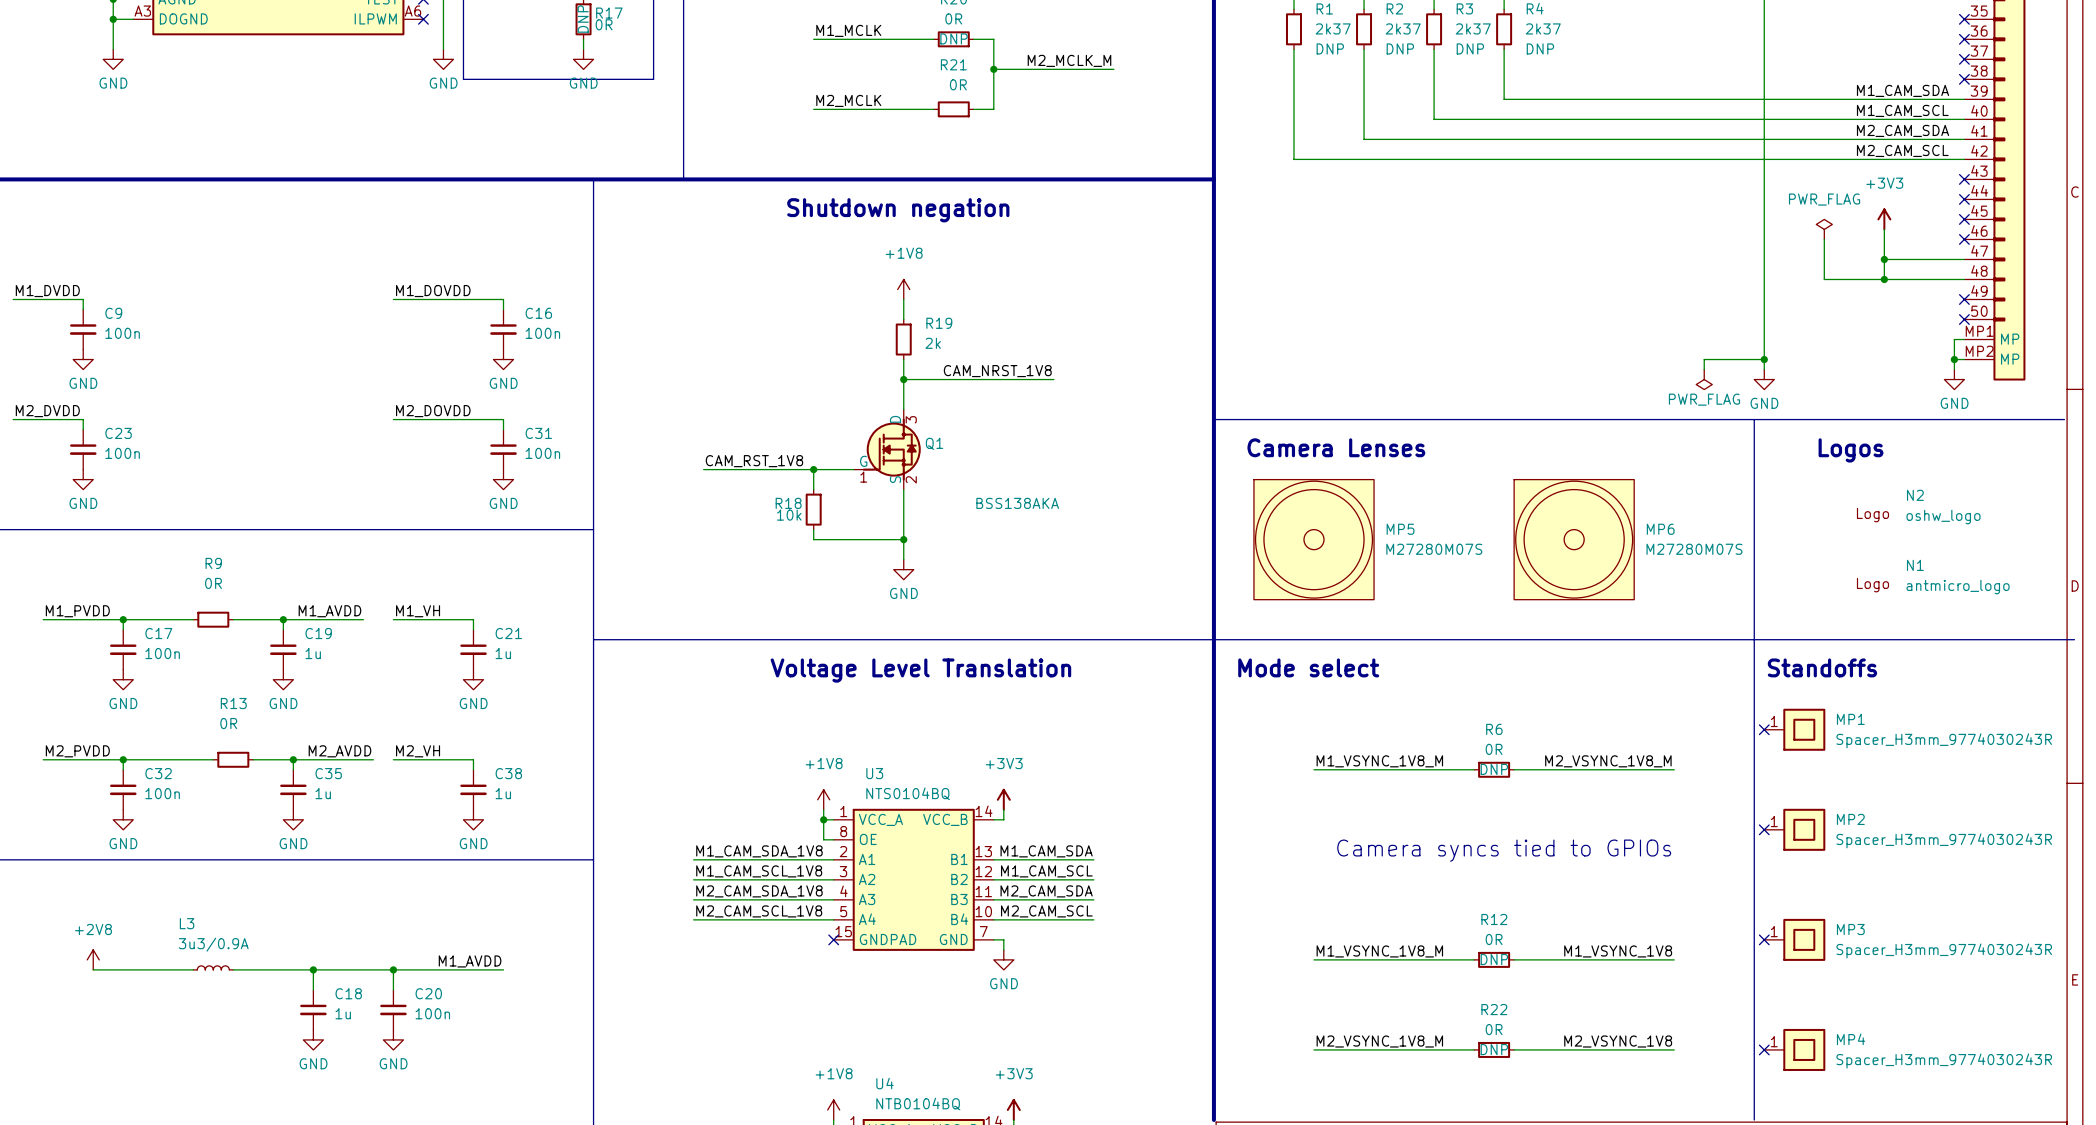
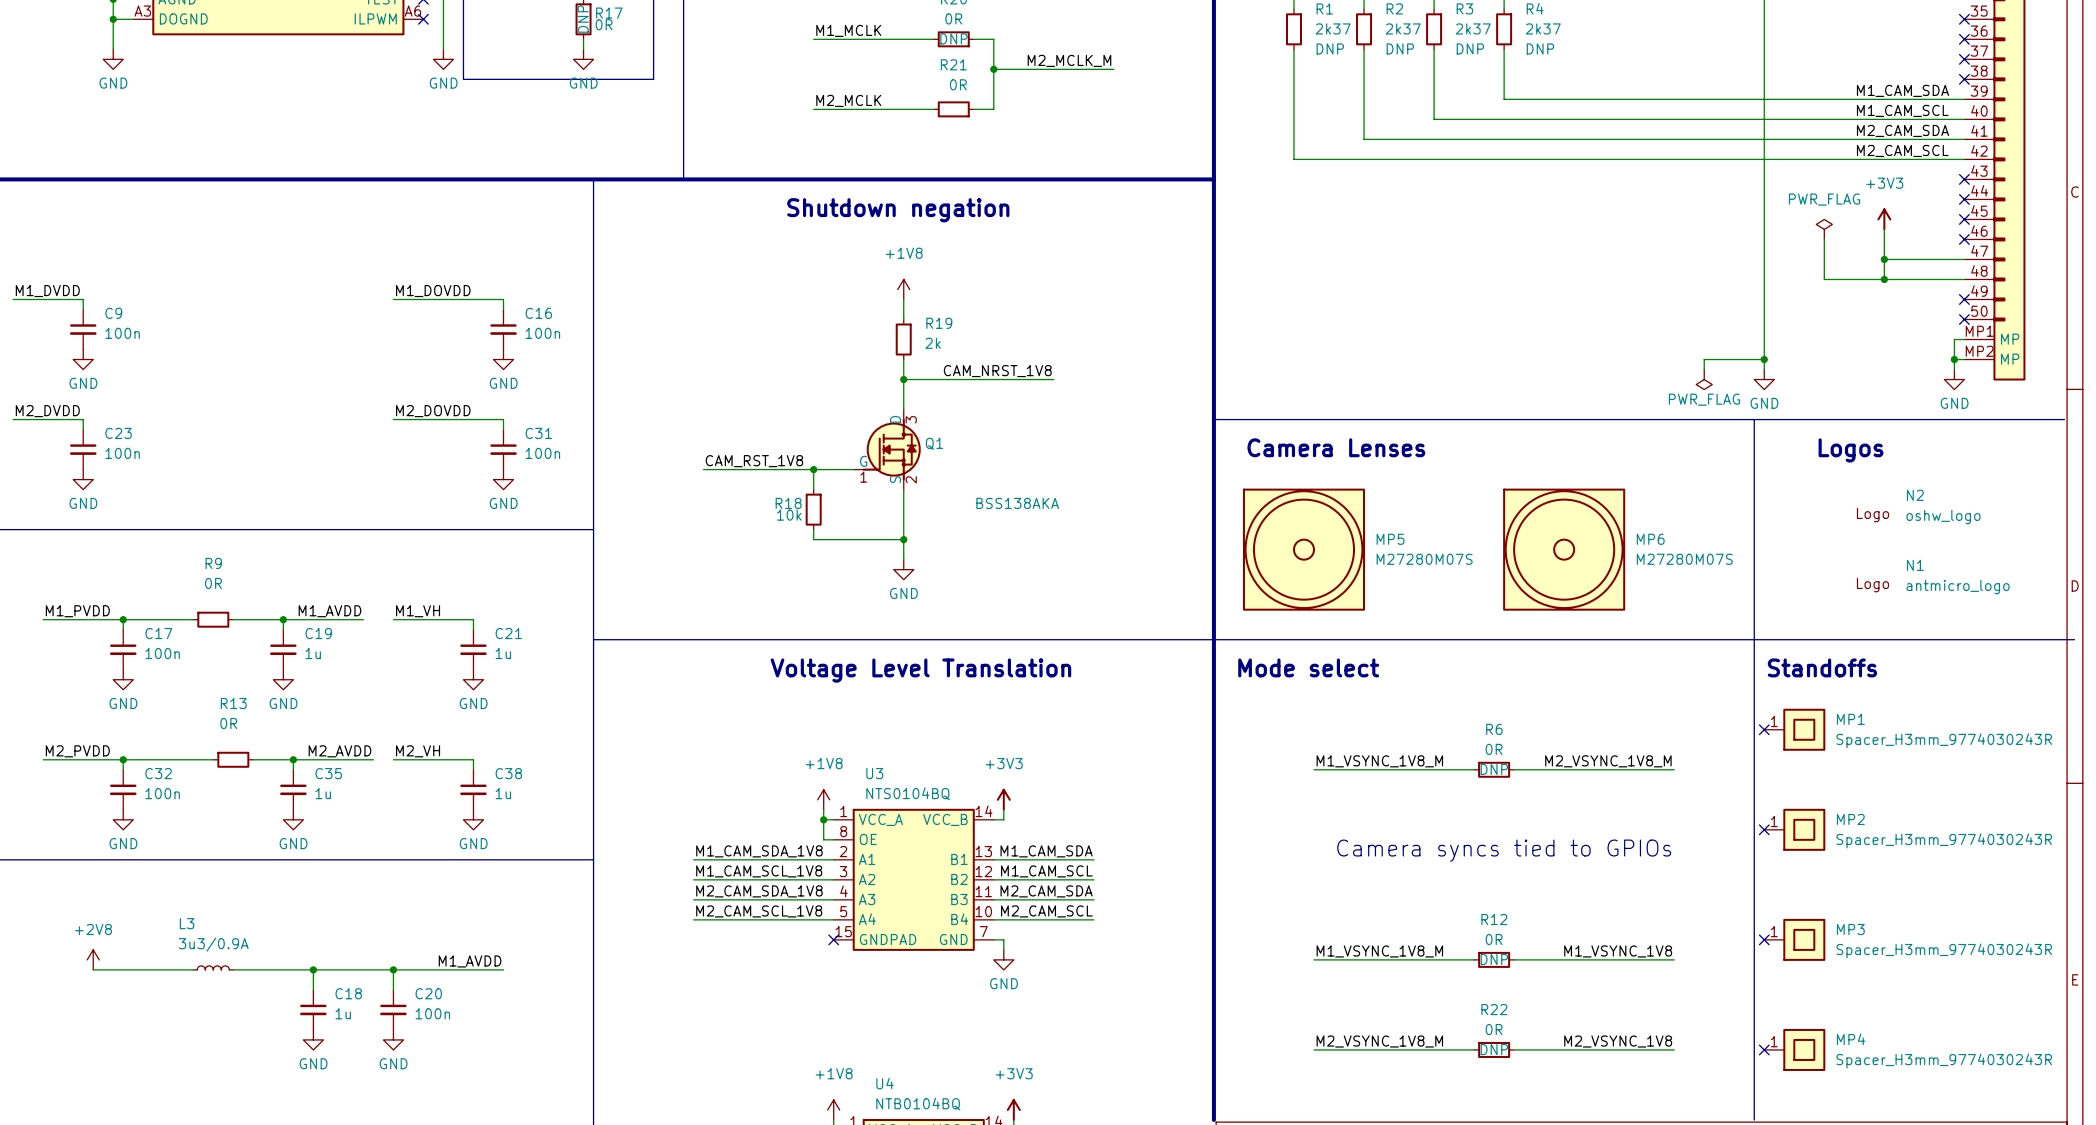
MP5 symbol: [1253, 479, 1375, 600] -> [1242, 488, 1366, 611]
MP6 symbol: [1514, 479, 1635, 600] -> [1503, 488, 1626, 611]

